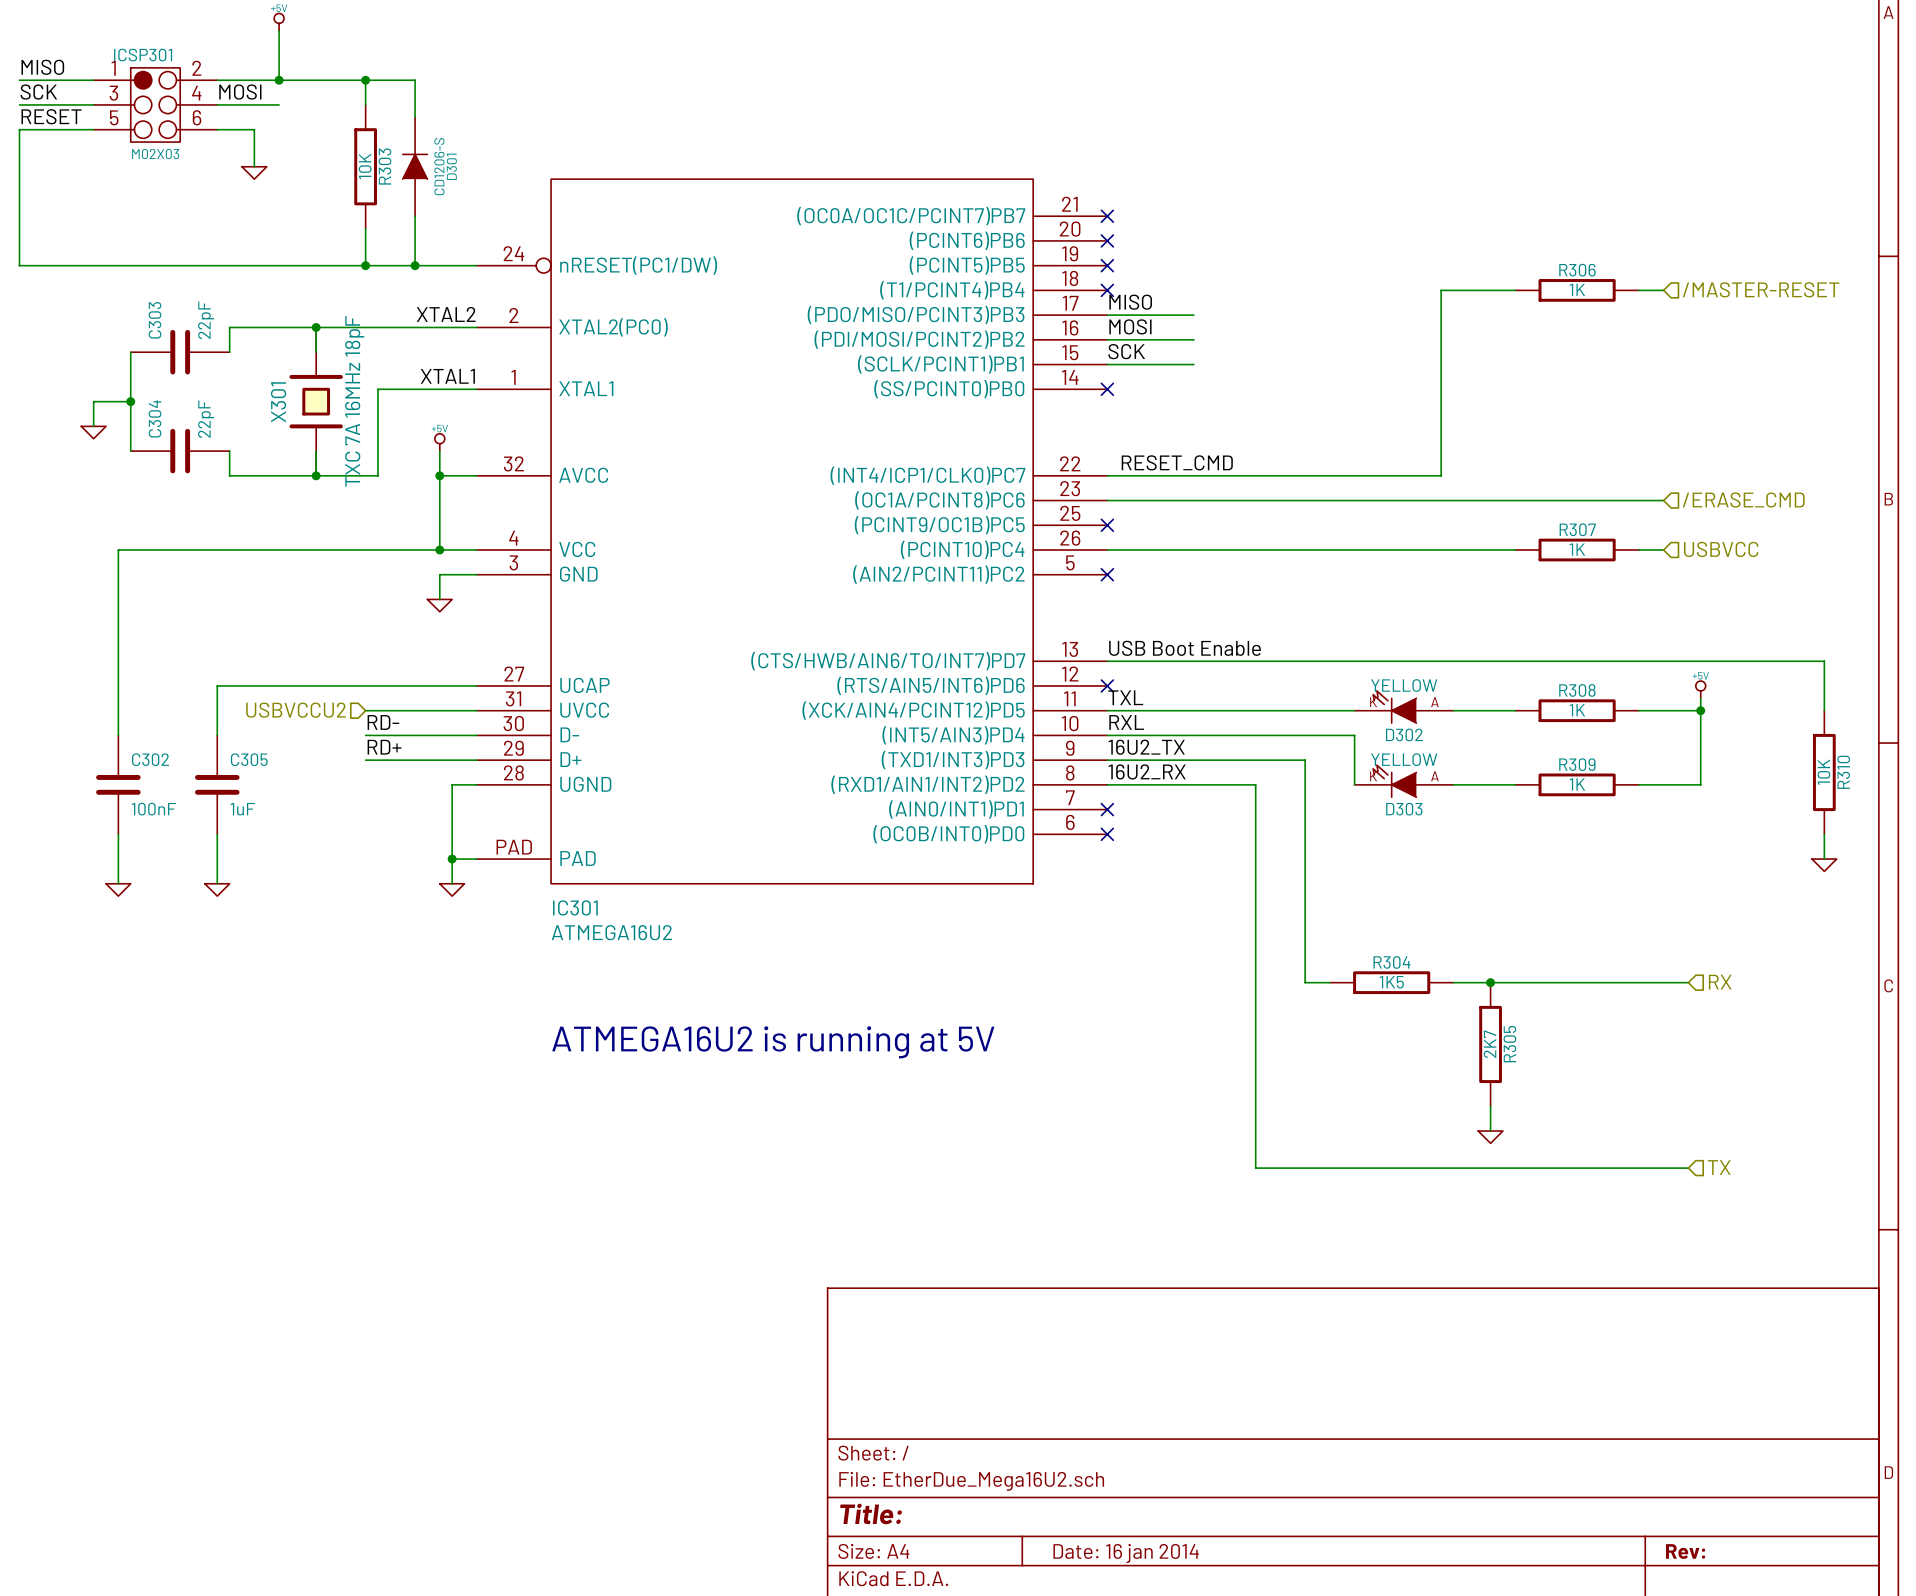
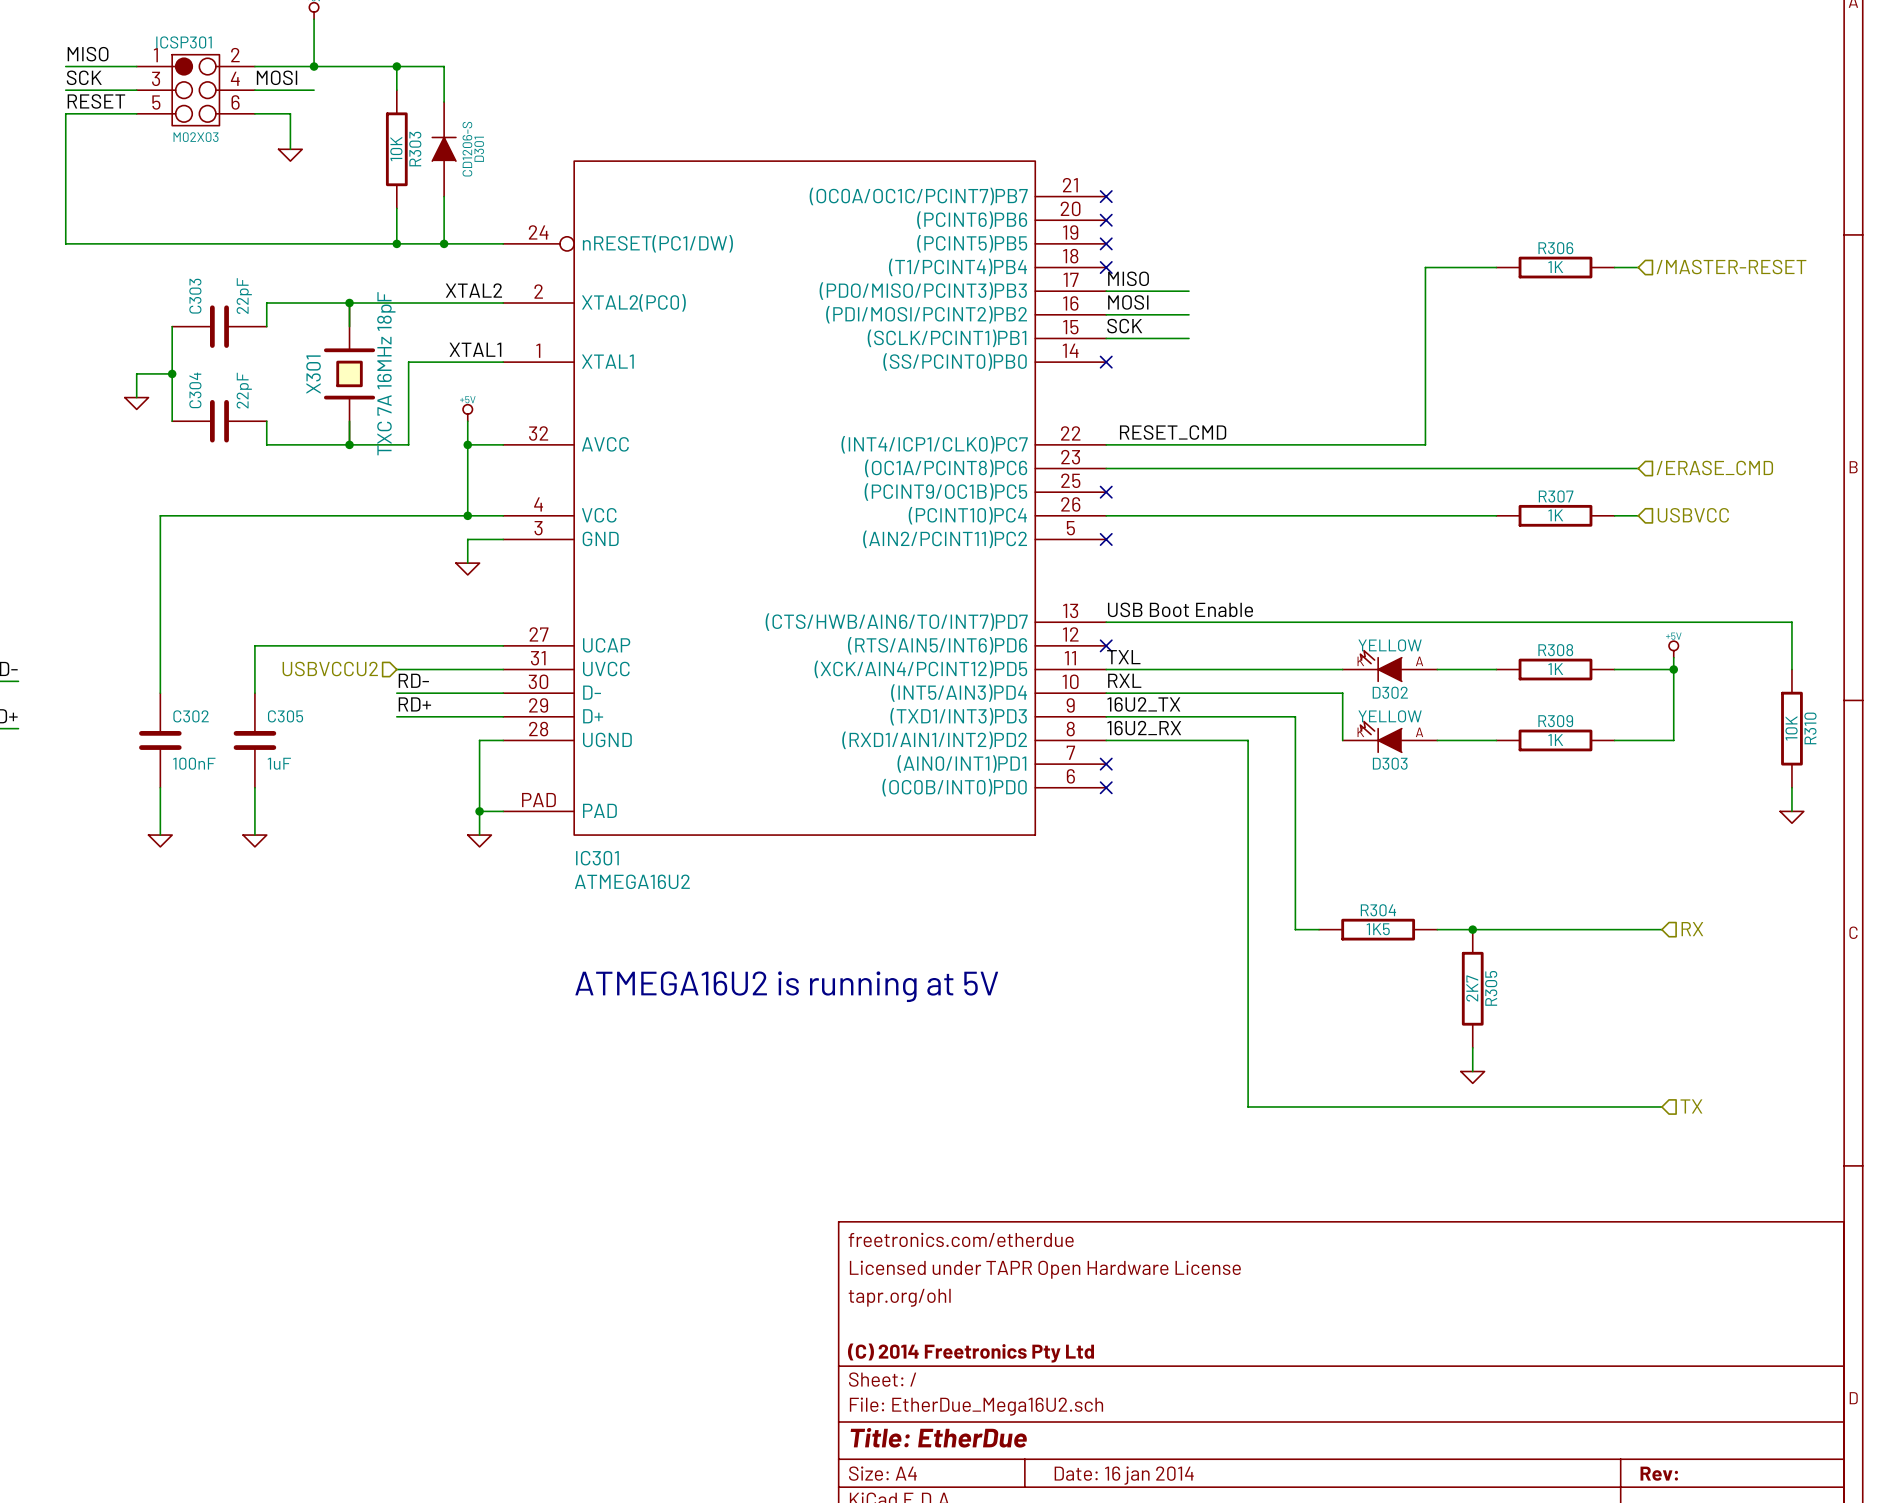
title block: none -> freetronics.com/etherdue (961, 1239)
title block: none -> Licensed under TAPR Open Hardware License (1045, 1269)
title block: none -> tapr.org/ohl (899, 1297)
title block: none -> (C) 2014 Freetronics Pty Ltd (970, 1353)
title block: Title: (871, 1513) -> Title: EtherDue (938, 1437)

